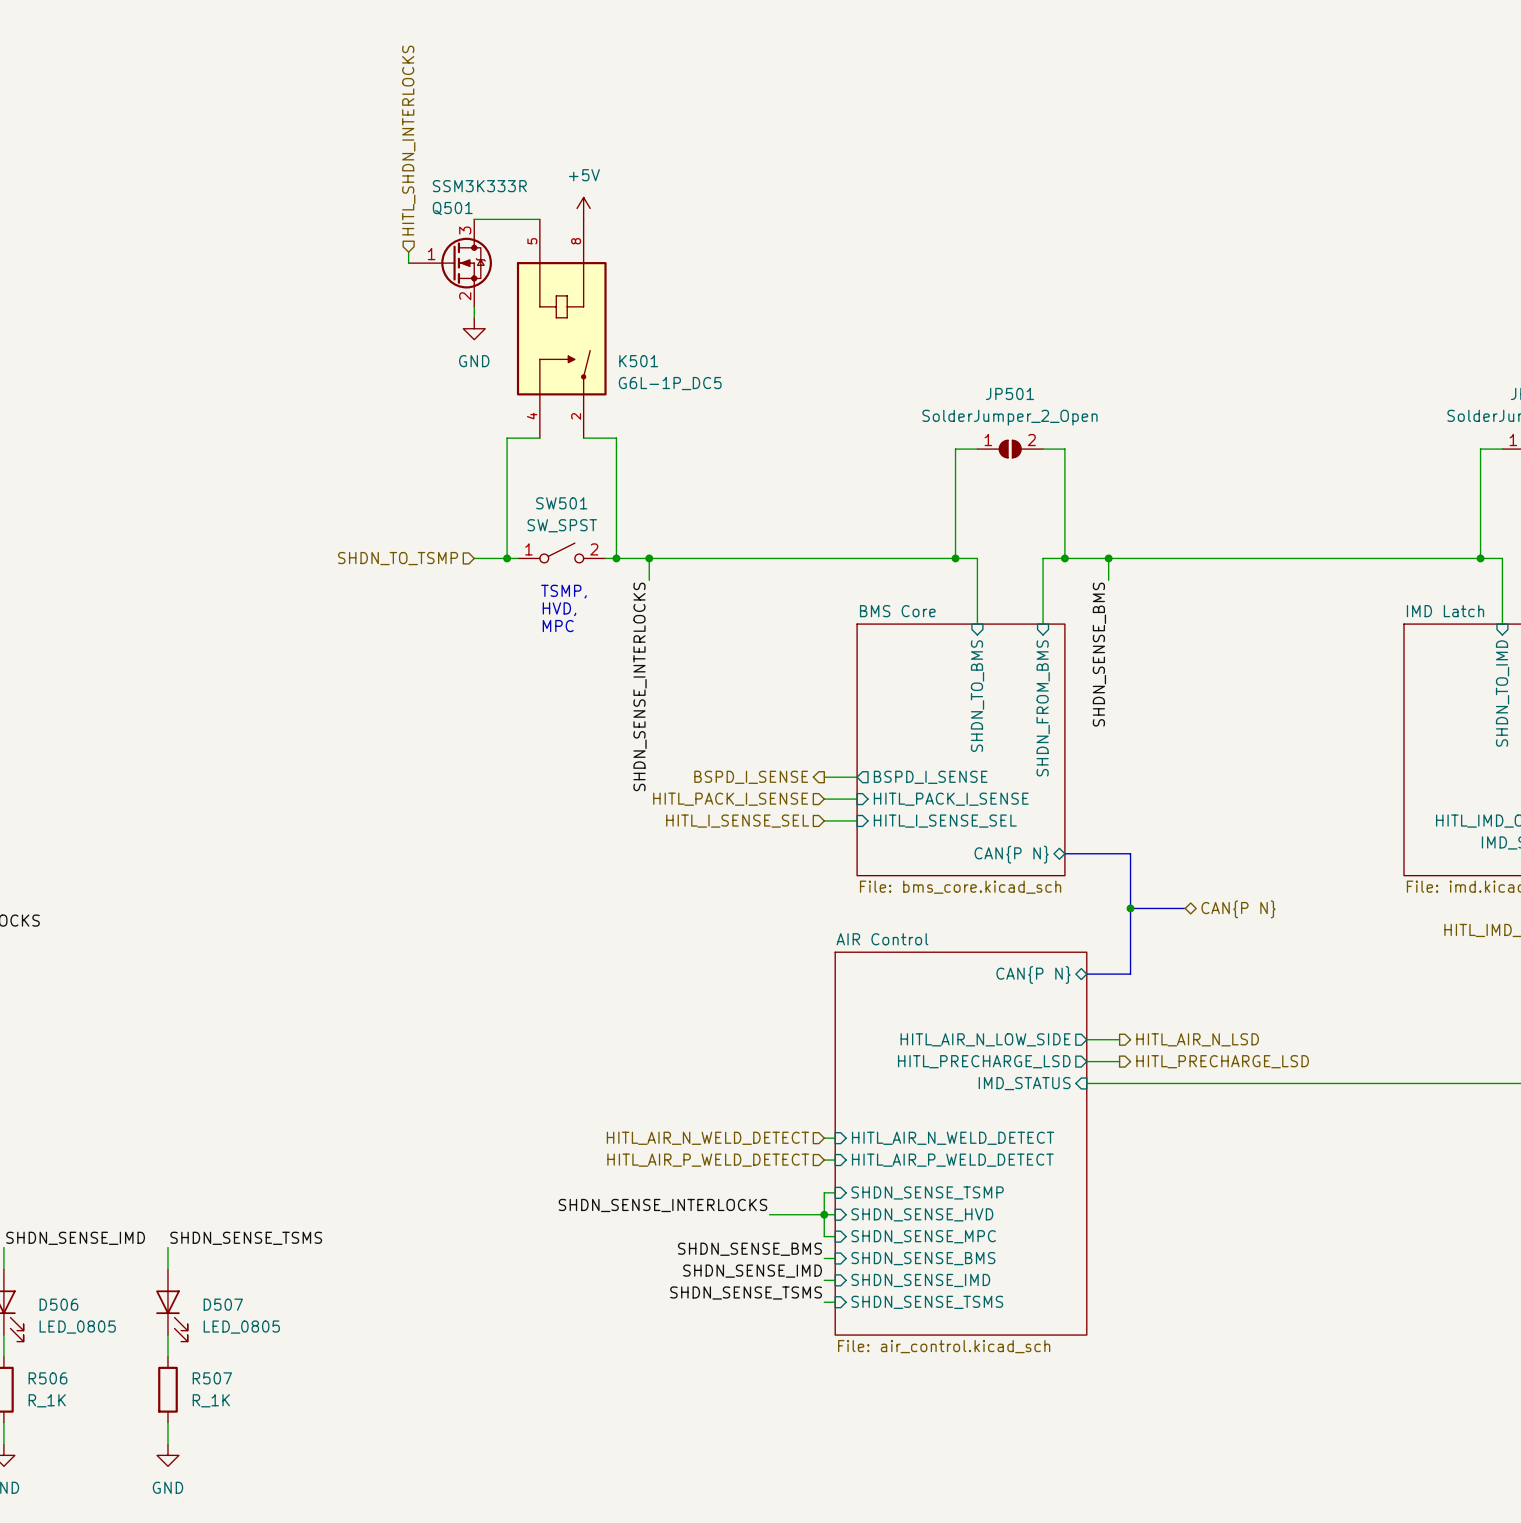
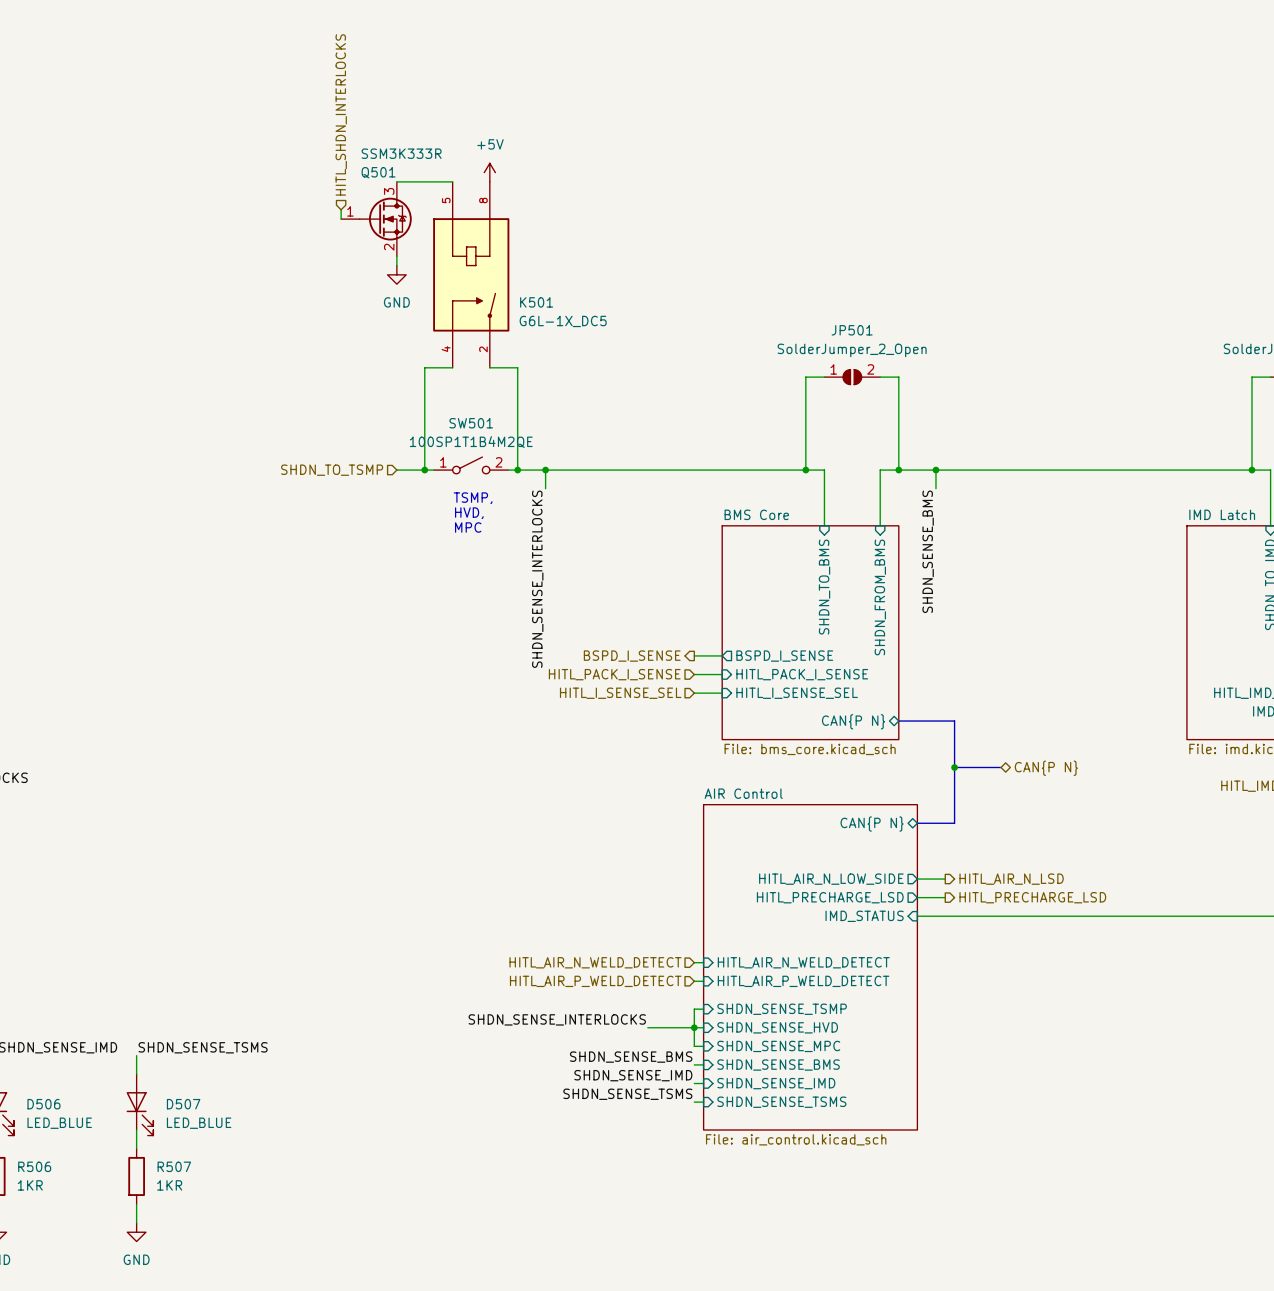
Q501 symbol: [408, 219, 492, 307] -> [341, 181, 412, 257]
K501 value: G6L-1P_DC5 (670, 383) -> G6L-1X_DC5 (563, 321)
SW501 value: SW_SPST (562, 525) -> 100SP1T1B4M2QE (471, 442)
D506 value: LED_0805 (77, 1327) -> LED_BLUE (59, 1123)
D507 value: LED_0805 (241, 1327) -> LED_BLUE (199, 1123)
R506 value: R_1K (47, 1400) -> 1KR (30, 1185)
R507 value: R_1K (211, 1400) -> 1KR (169, 1185)

